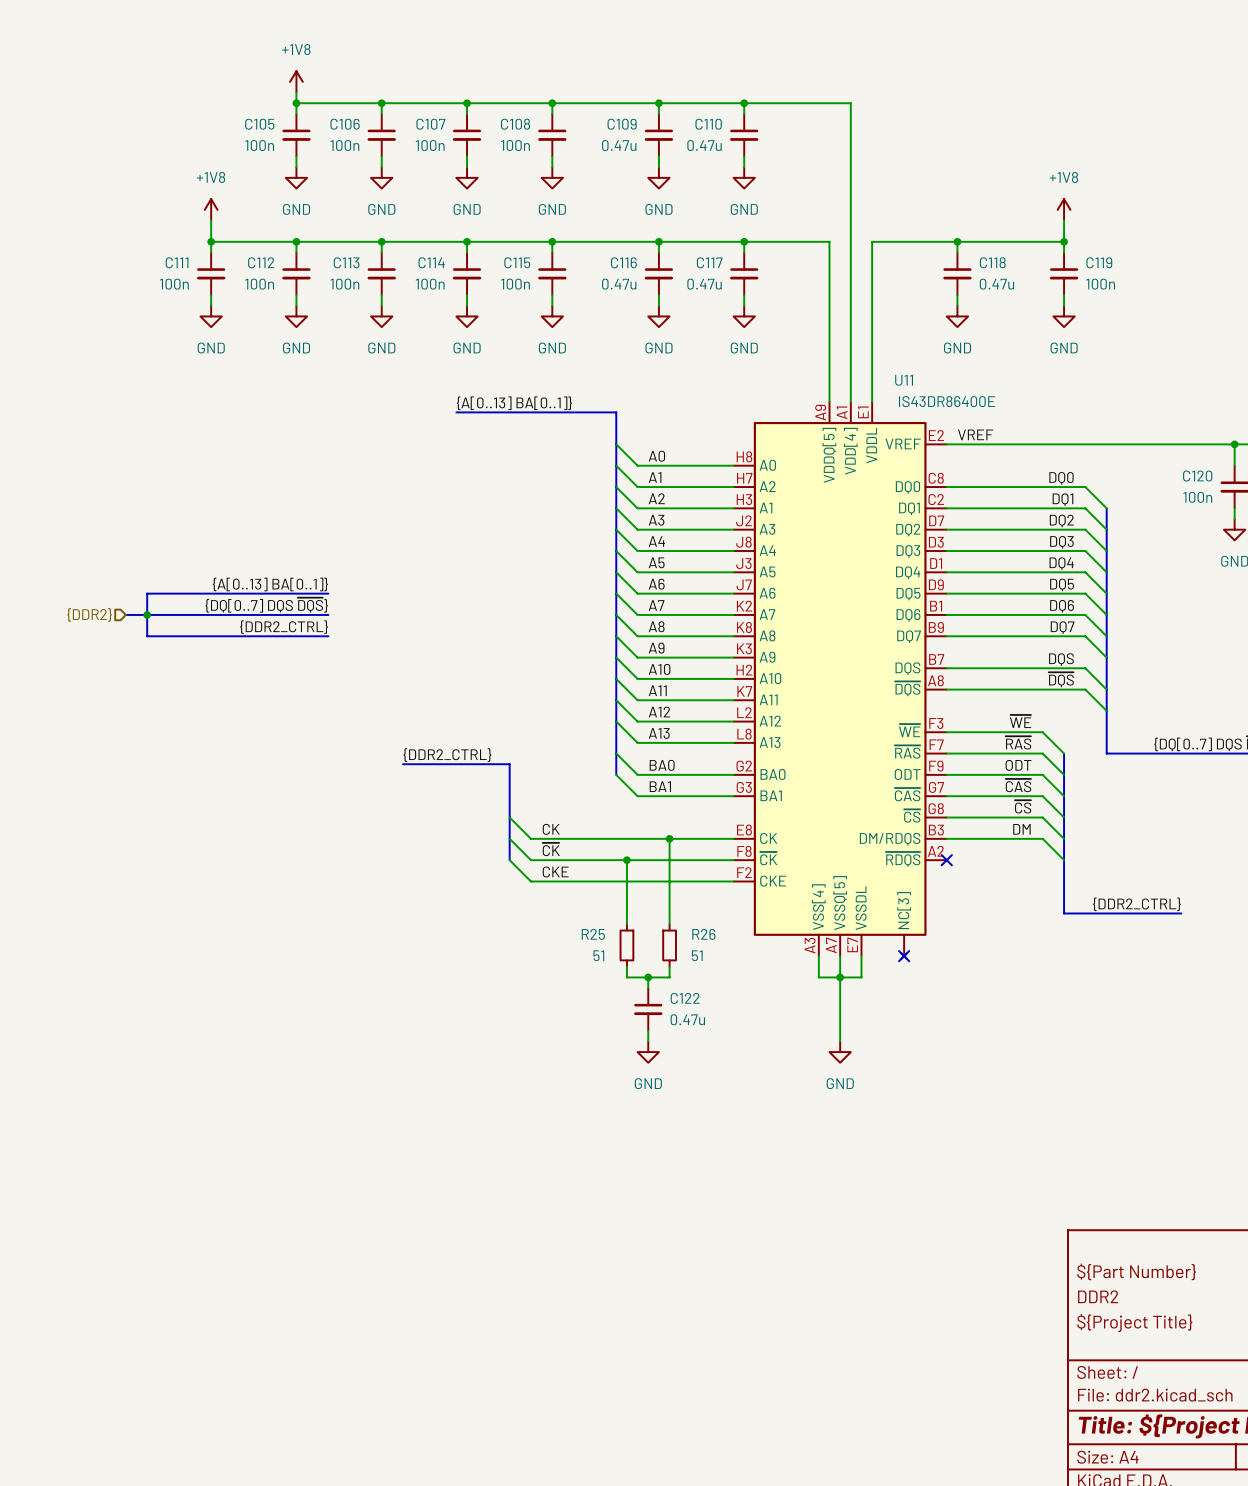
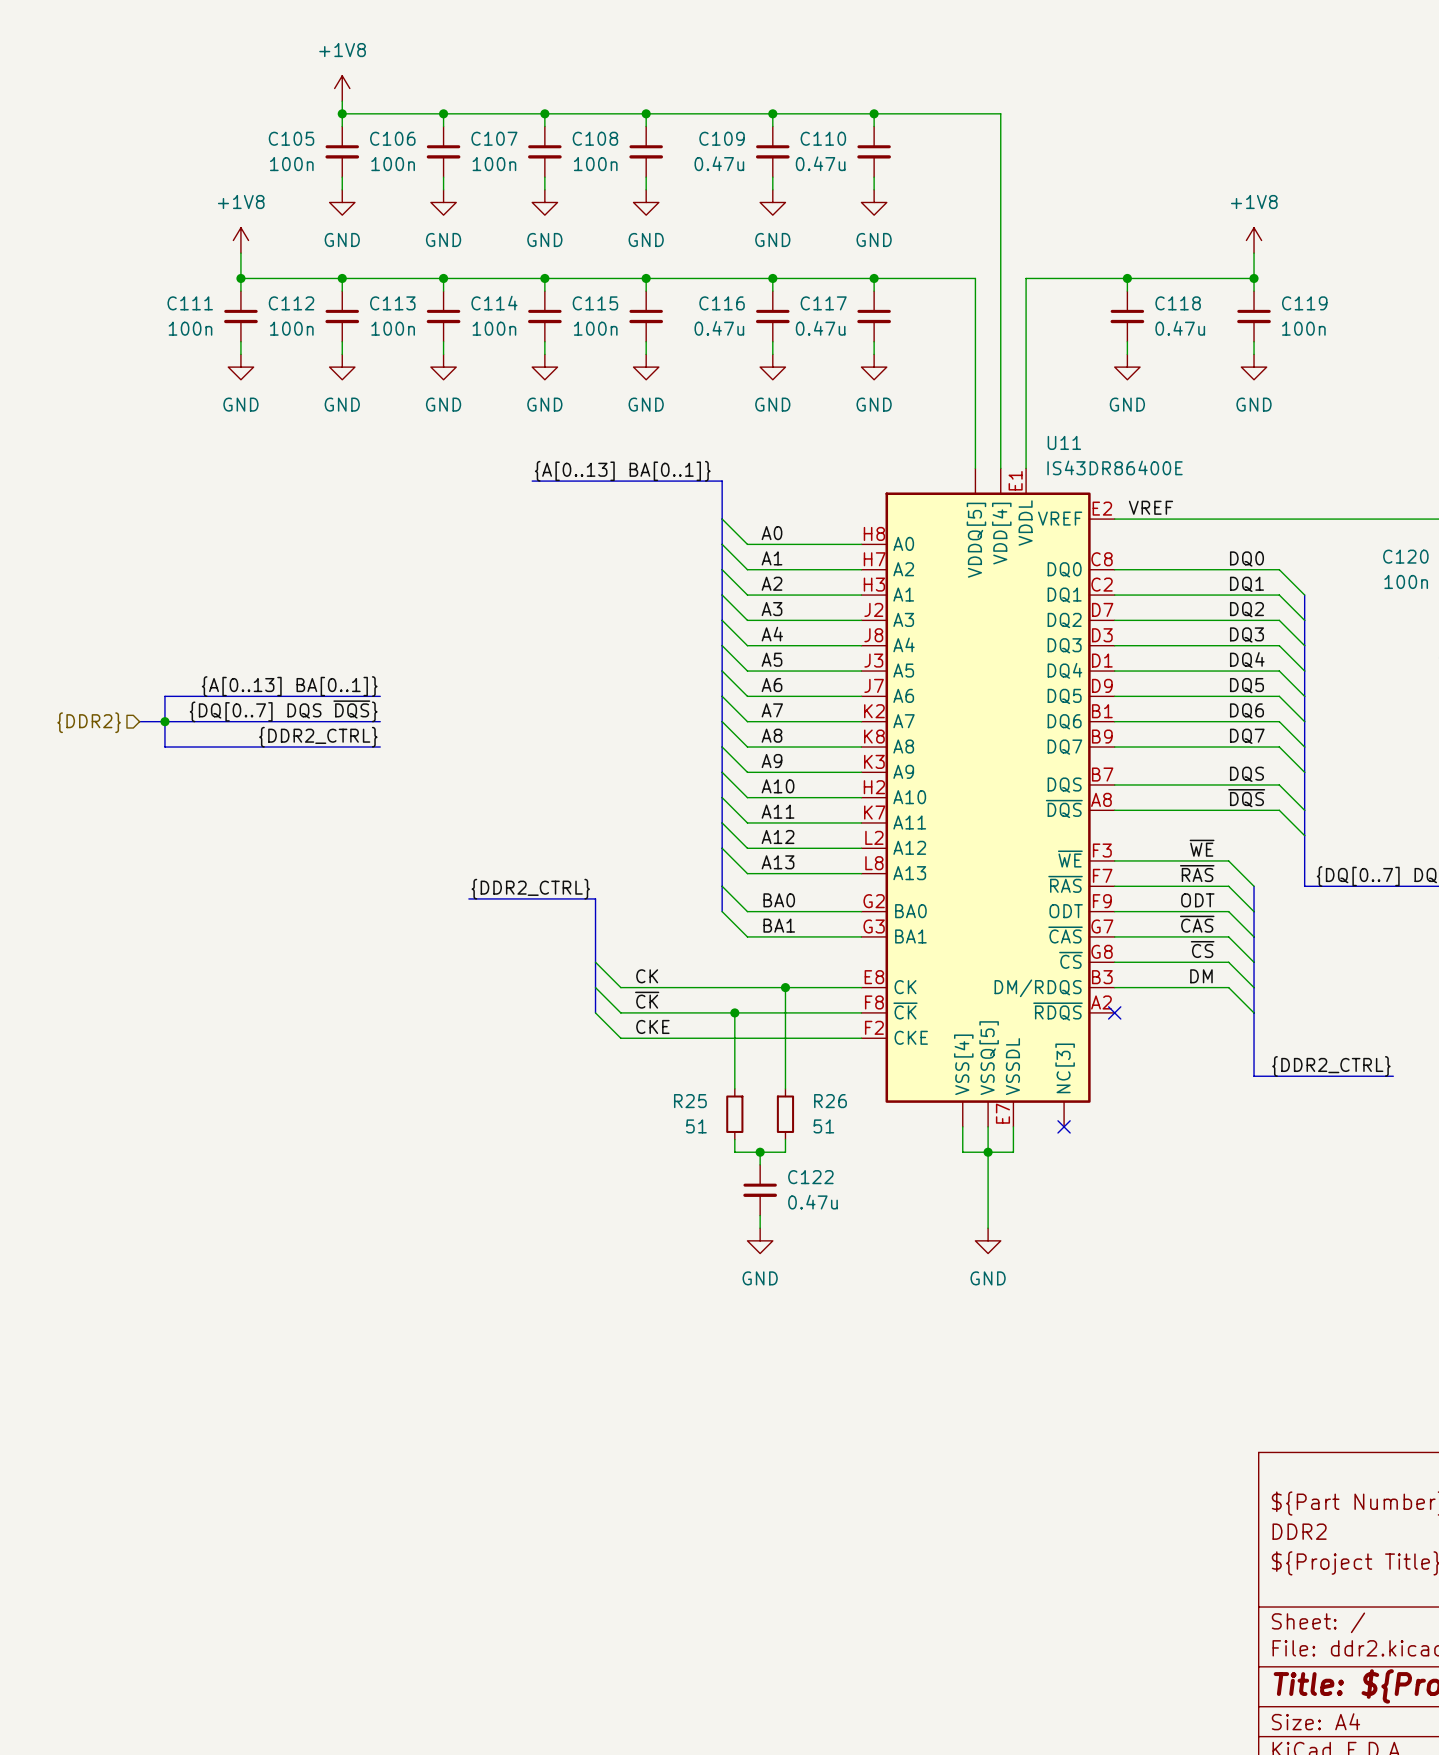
U11 symbol: [733, 401, 947, 959] -> [861, 468, 1115, 1127]

